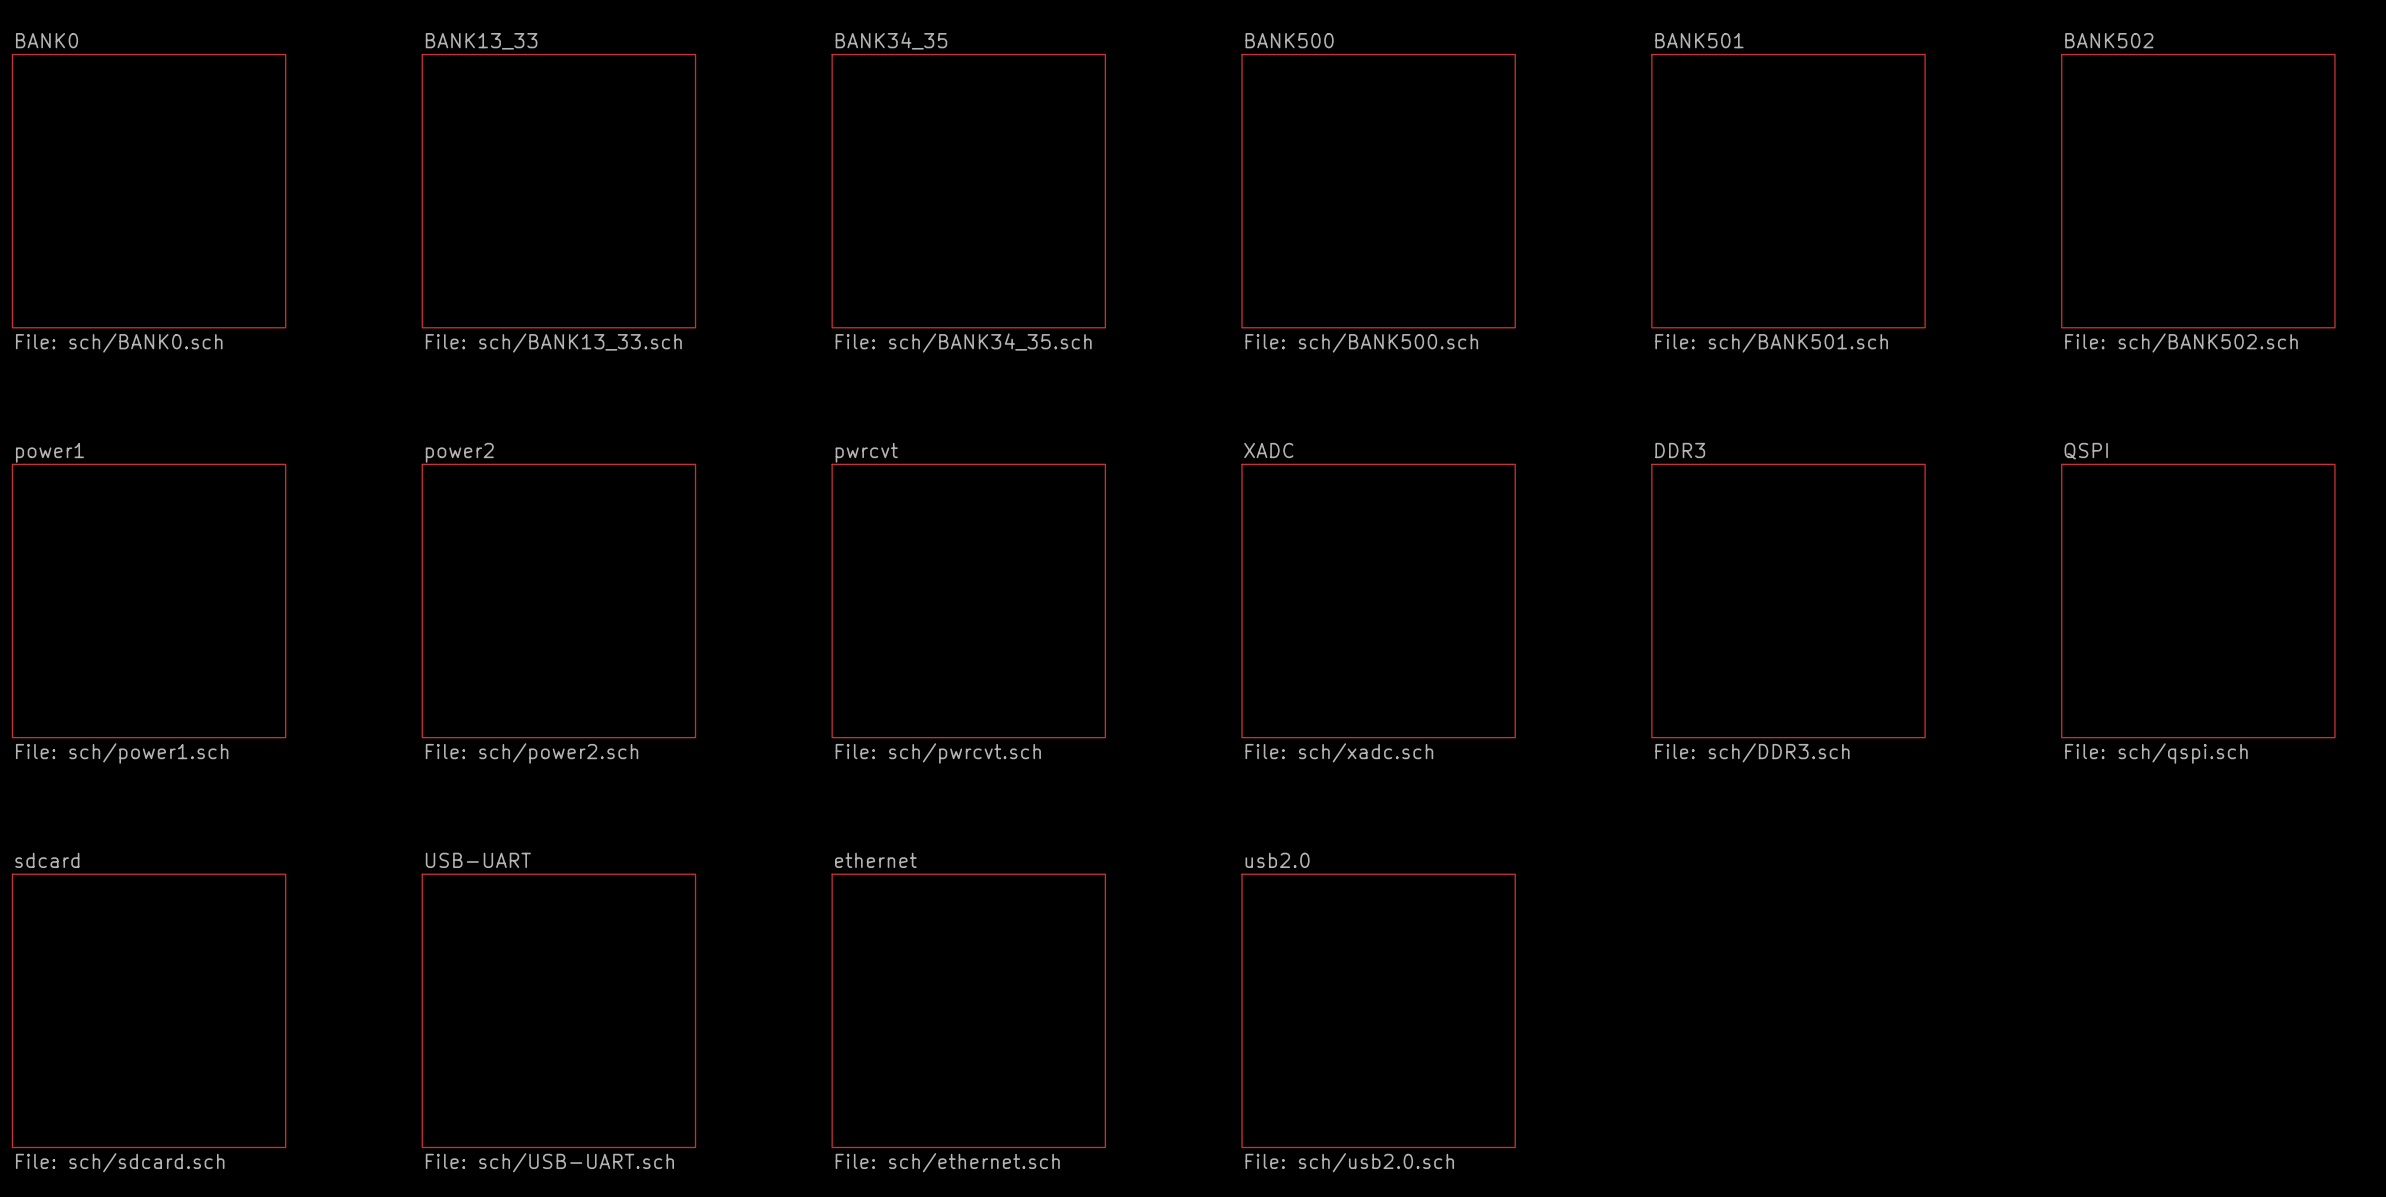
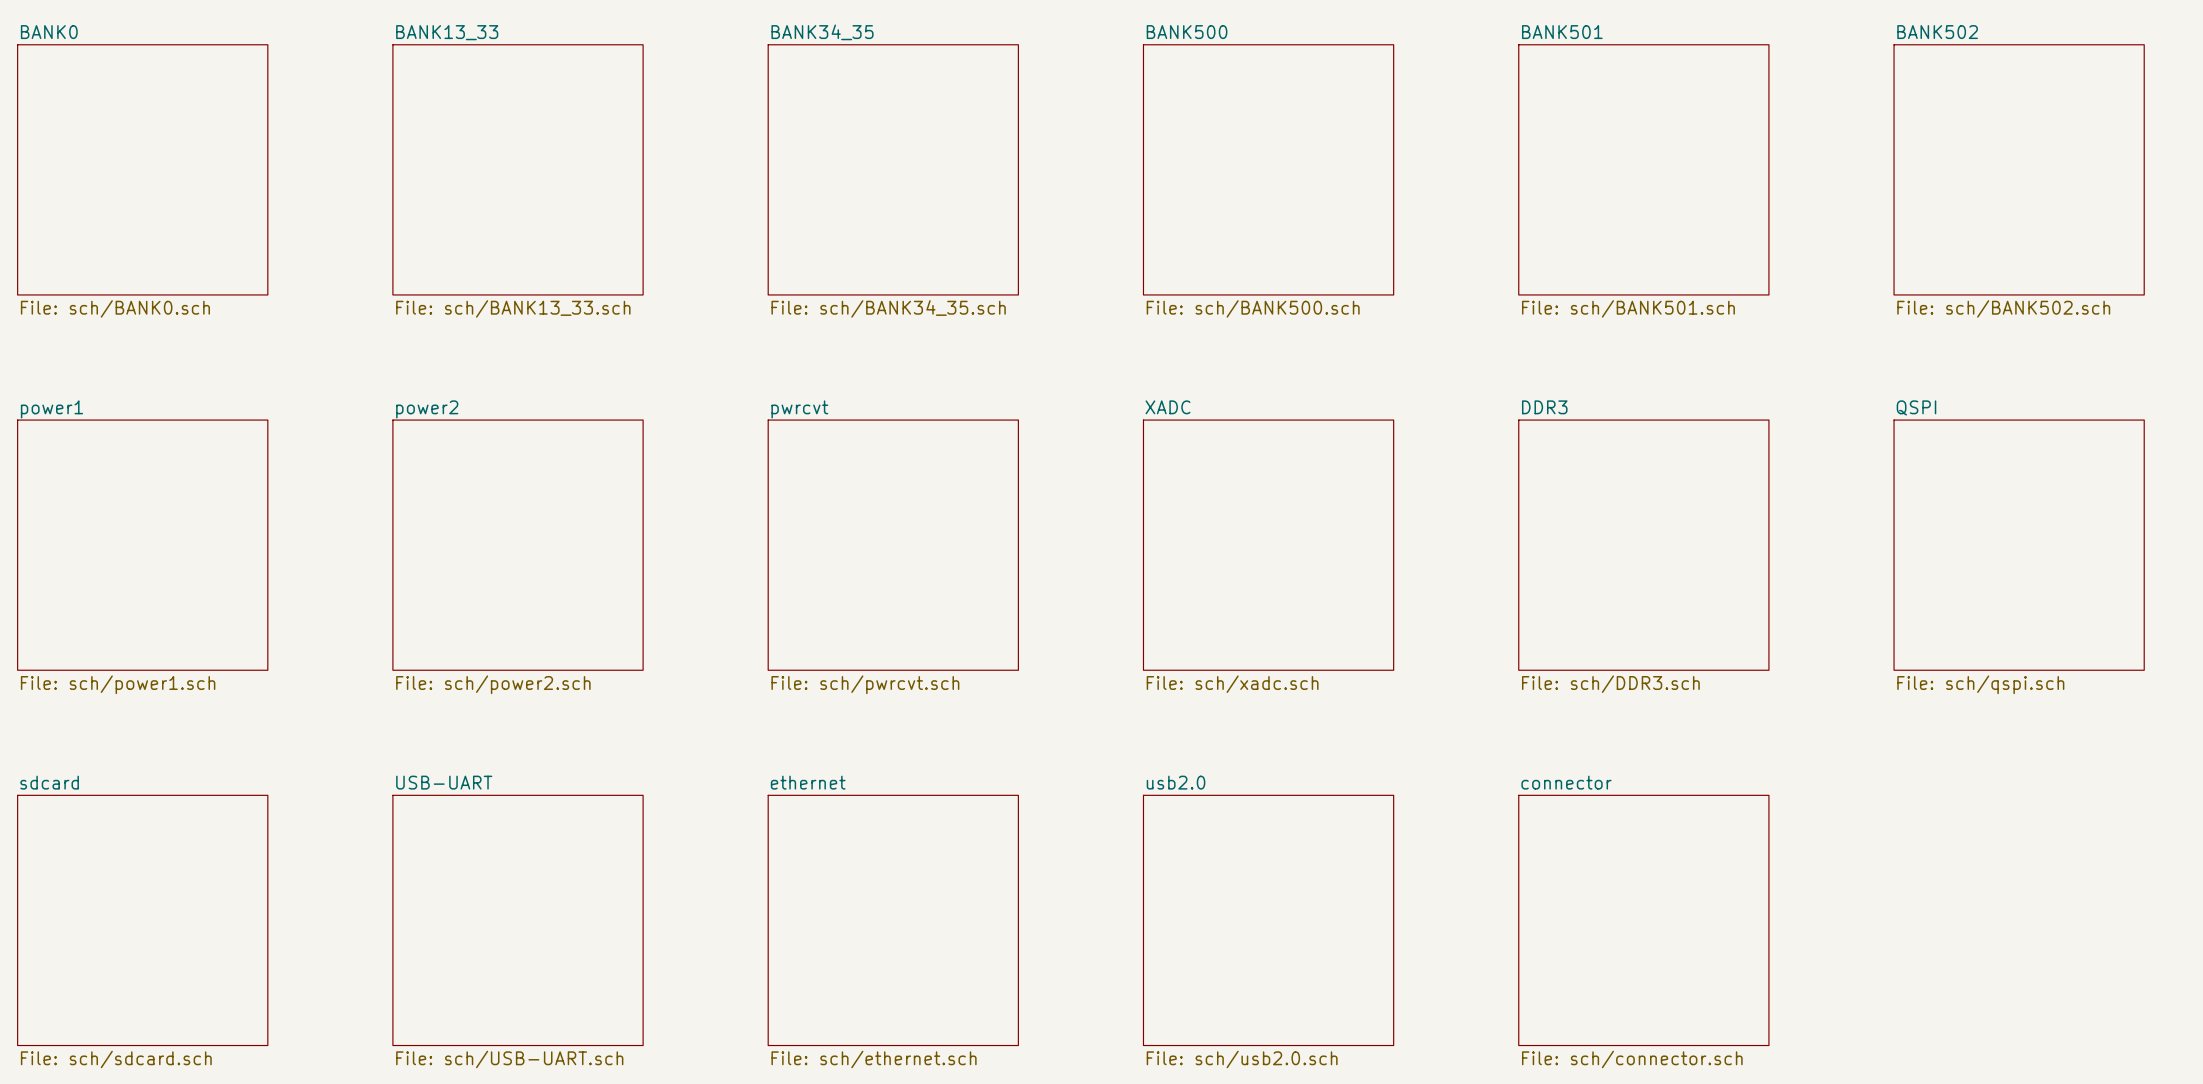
sheet connector: none -> File: sch/connector.sch (1643, 920)

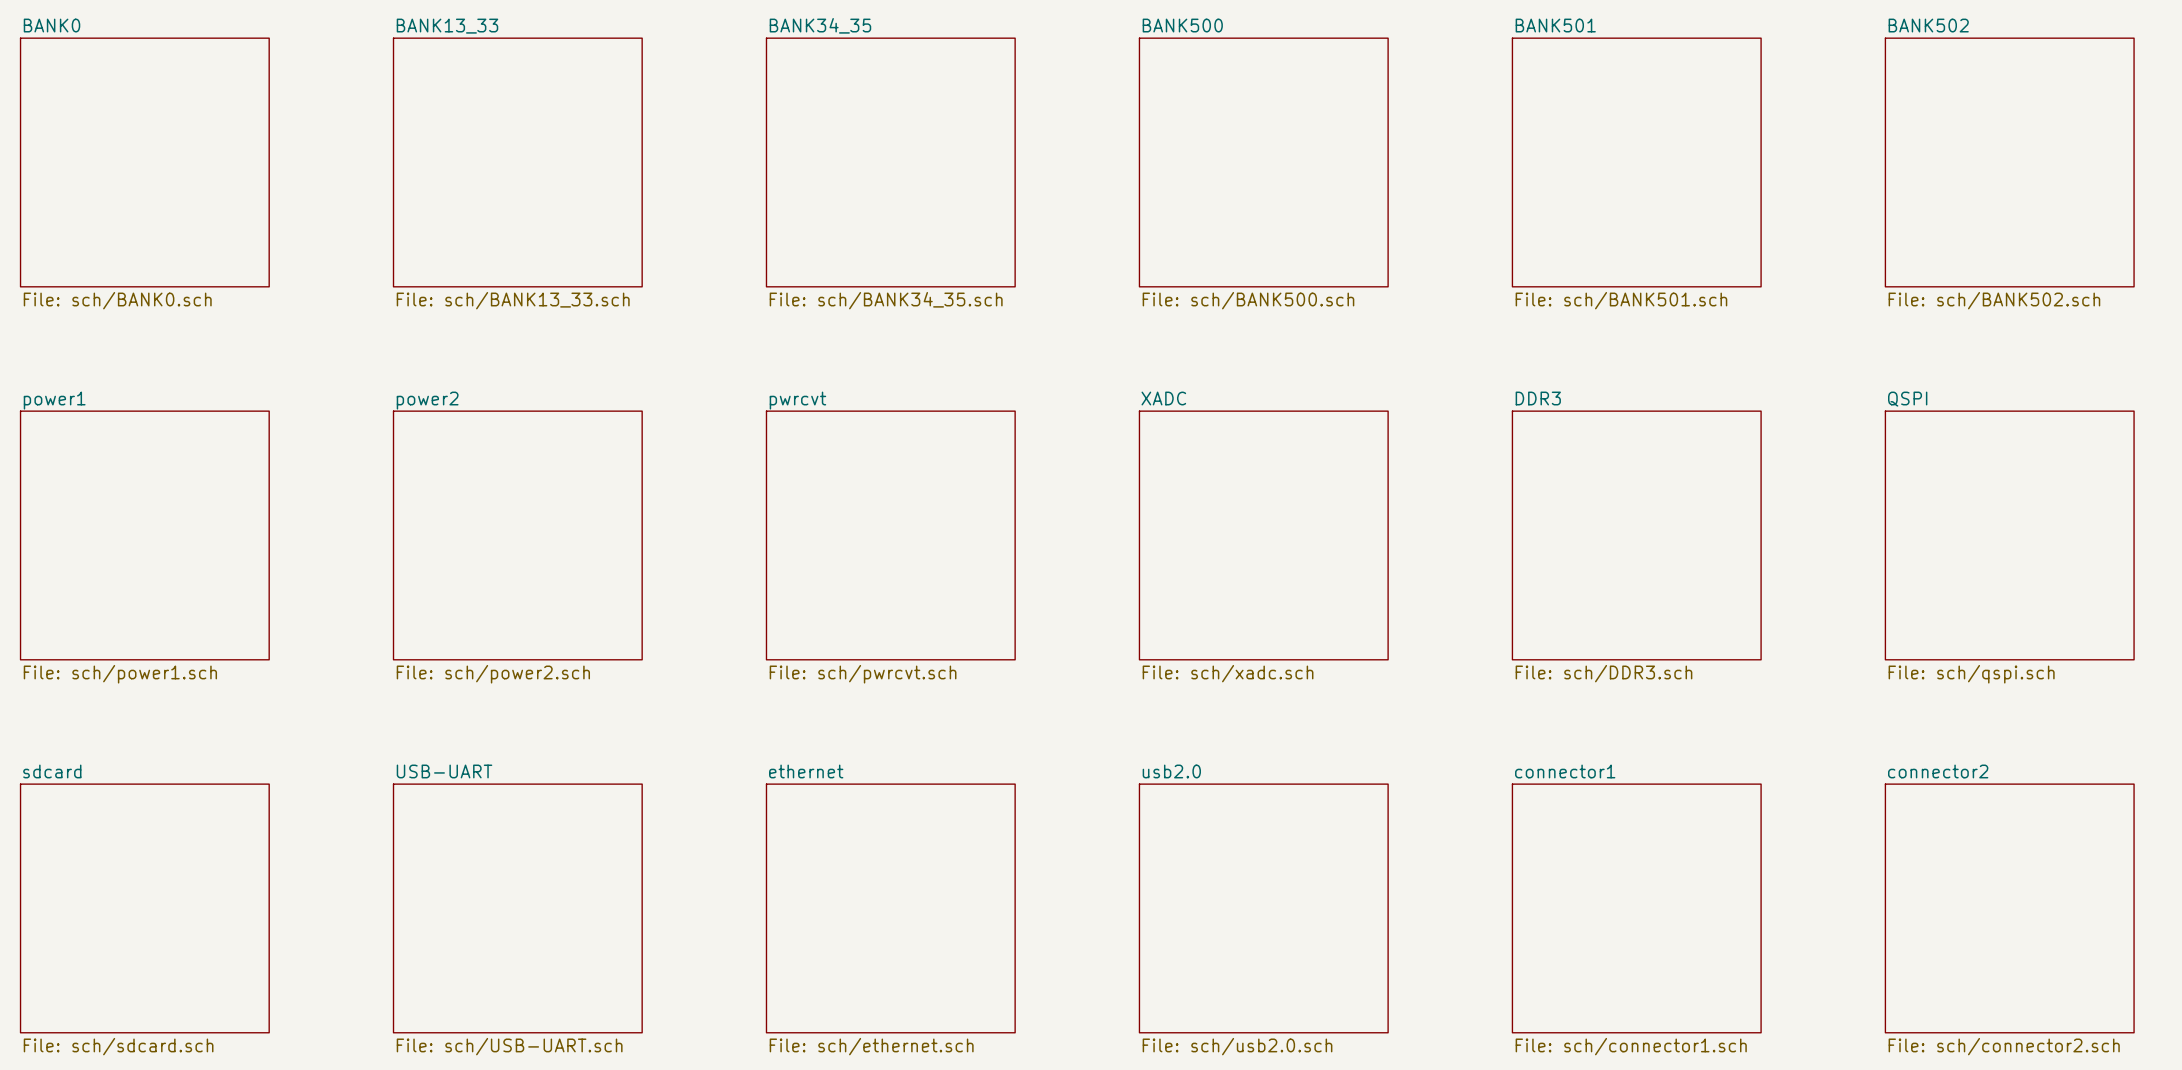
sheet connector name: connector (1566, 782) -> connector1 (1565, 771)
sheet connector2: none -> File: sch/connector2.sch (2009, 908)
sheet connector value: File: sch/connector.sch (1632, 1059) -> File: sch/connector1.sch (1631, 1046)

